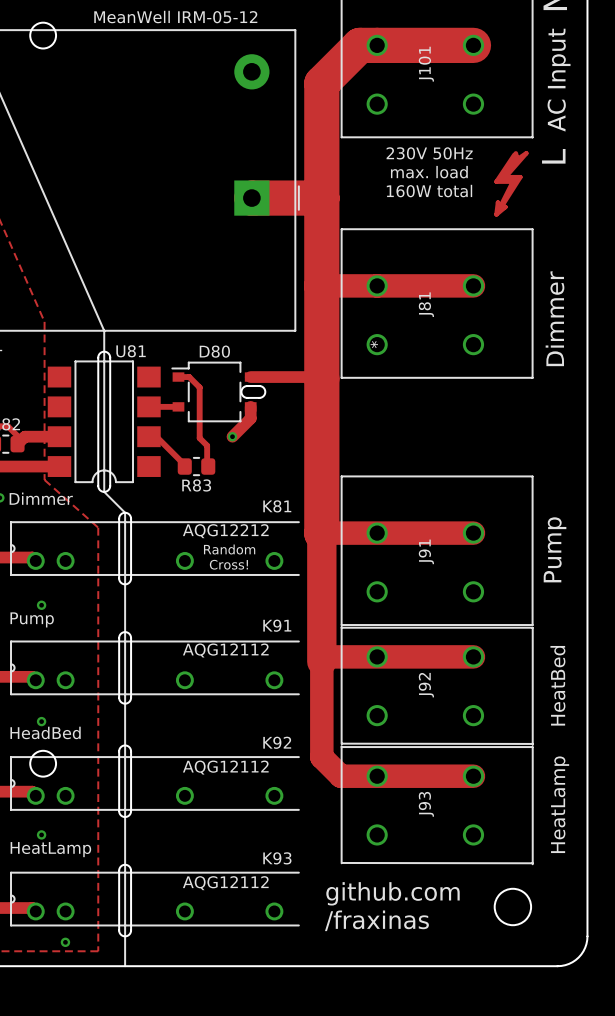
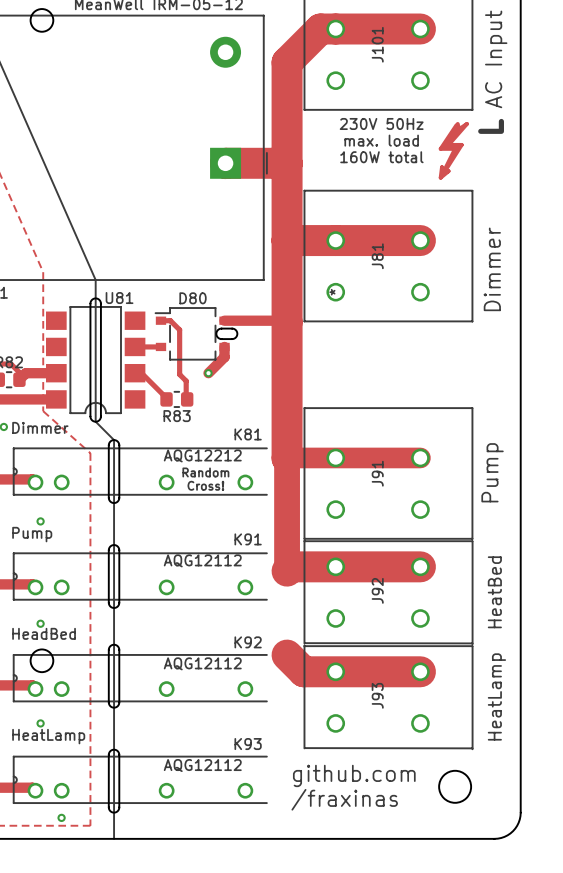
track width: thin (321, 285) (473, 285) -> thick (287, 240) (420, 240)
track width: thin (473, 656) (326, 656) (321, 661) -> thick (420, 566) (291, 566) (287, 571)
track: (321, 661) (321, 757) -> none
track width: thin (321, 757) (340, 776) (473, 776) -> thick (287, 655) (303, 671) (420, 671)

